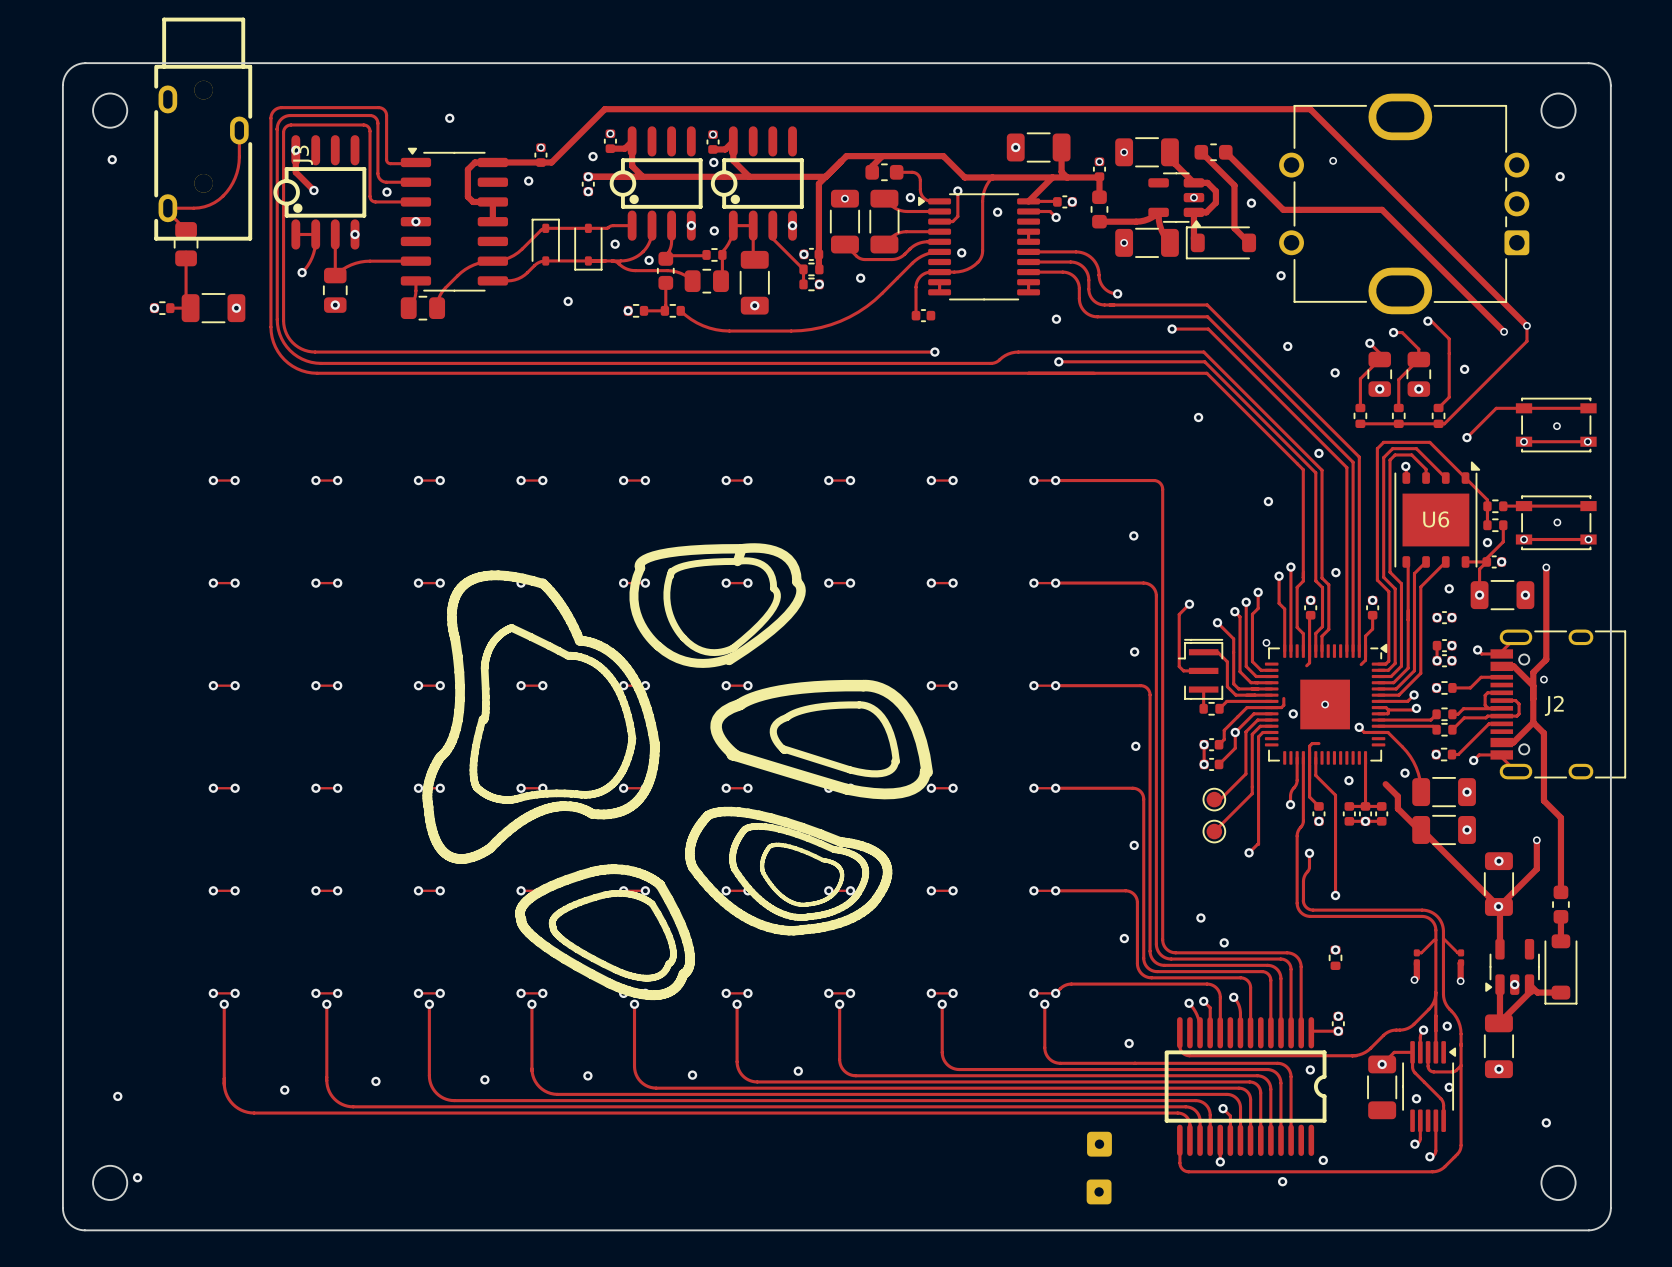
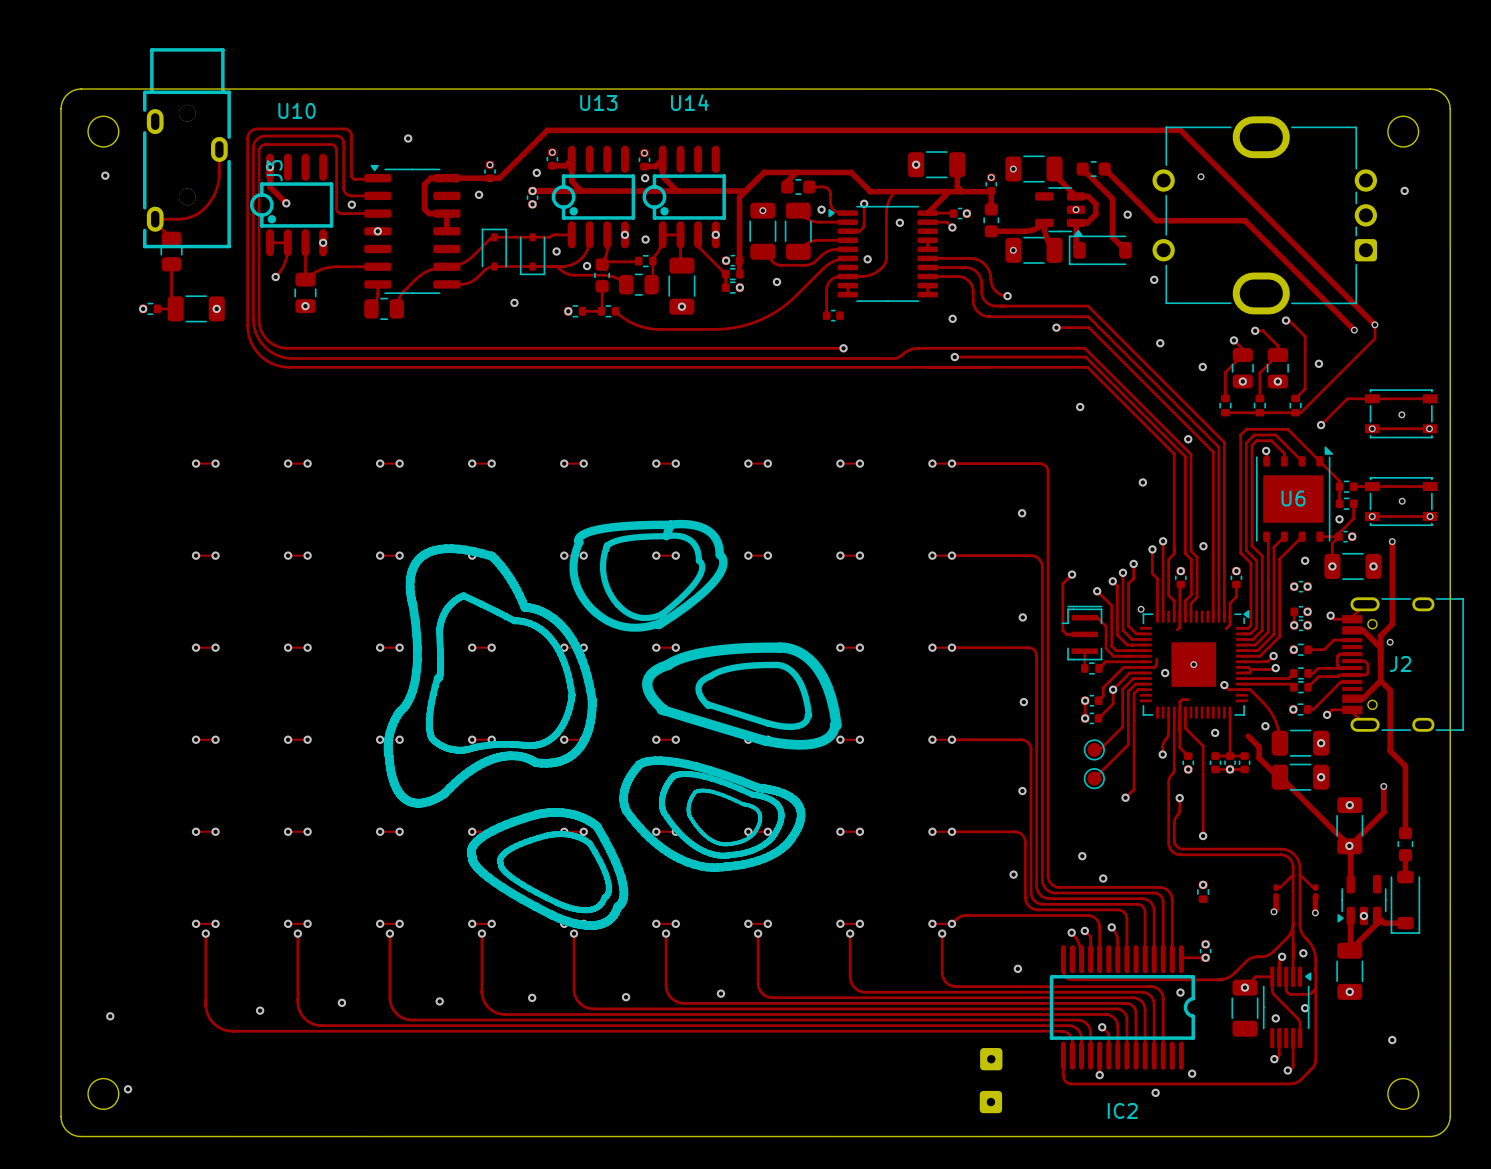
U13 name: none -> U13 (598, 102)
U14 name: none -> U14 (689, 102)
U10 name: none -> U10 (296, 110)
IC2 name: none -> IC2 (1122, 1110)

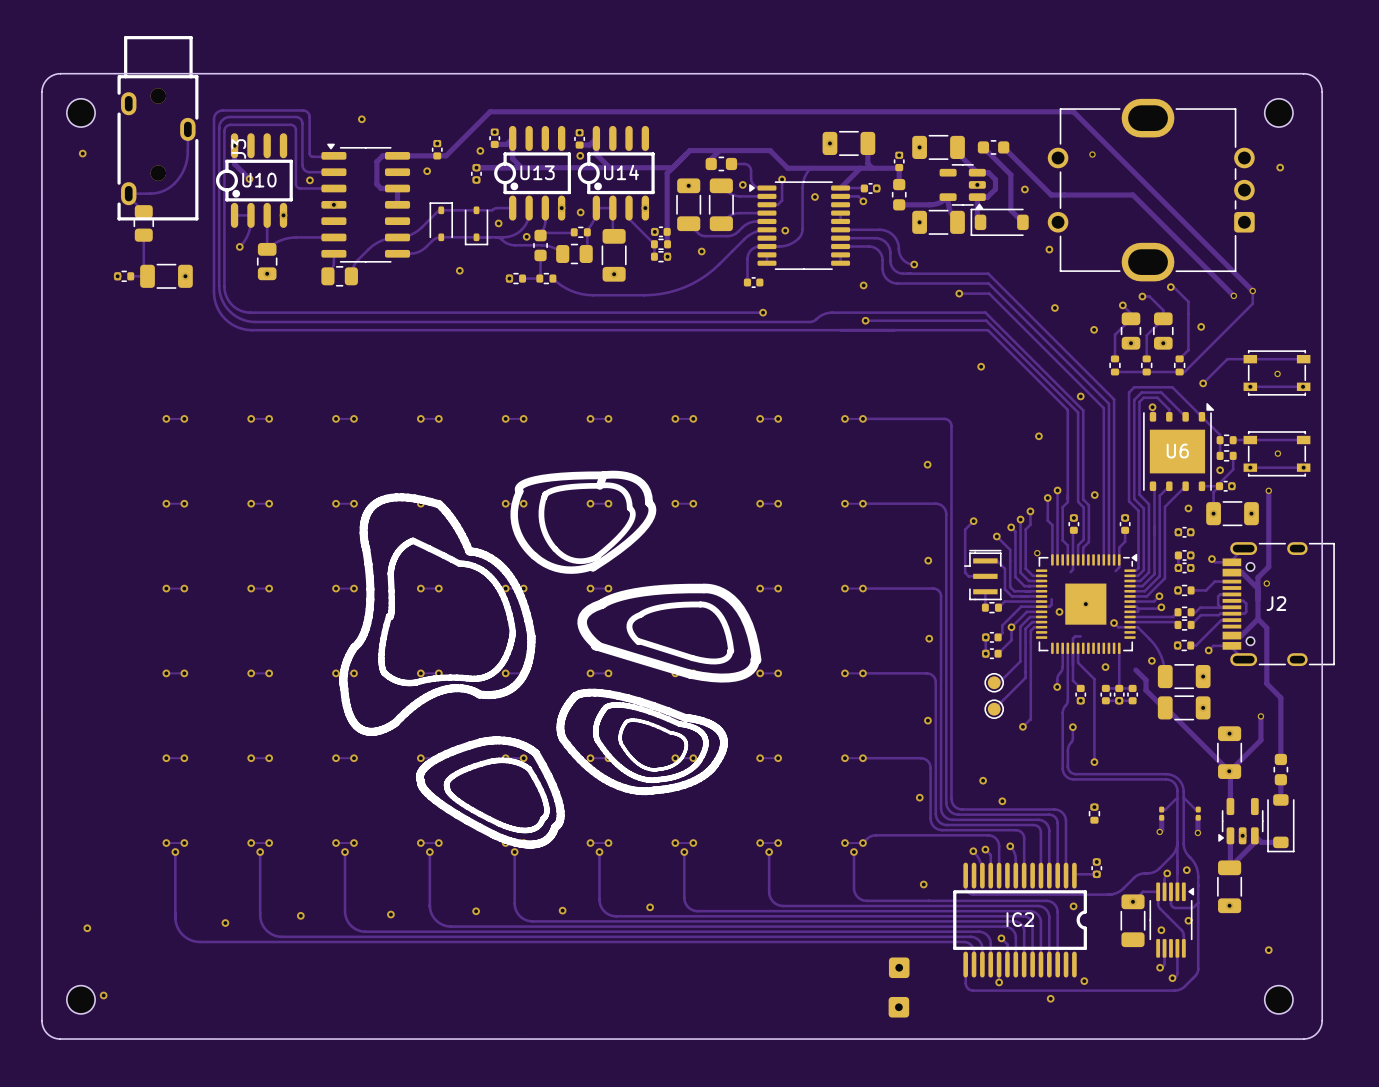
U13 name position: U13 (598, 102) -> U13 (537, 172)
U14 name position: U14 (689, 102) -> U14 (621, 172)
U10 name position: U10 (296, 110) -> U10 (259, 180)
IC2 name position: IC2 (1122, 1110) -> IC2 (1020, 919)

